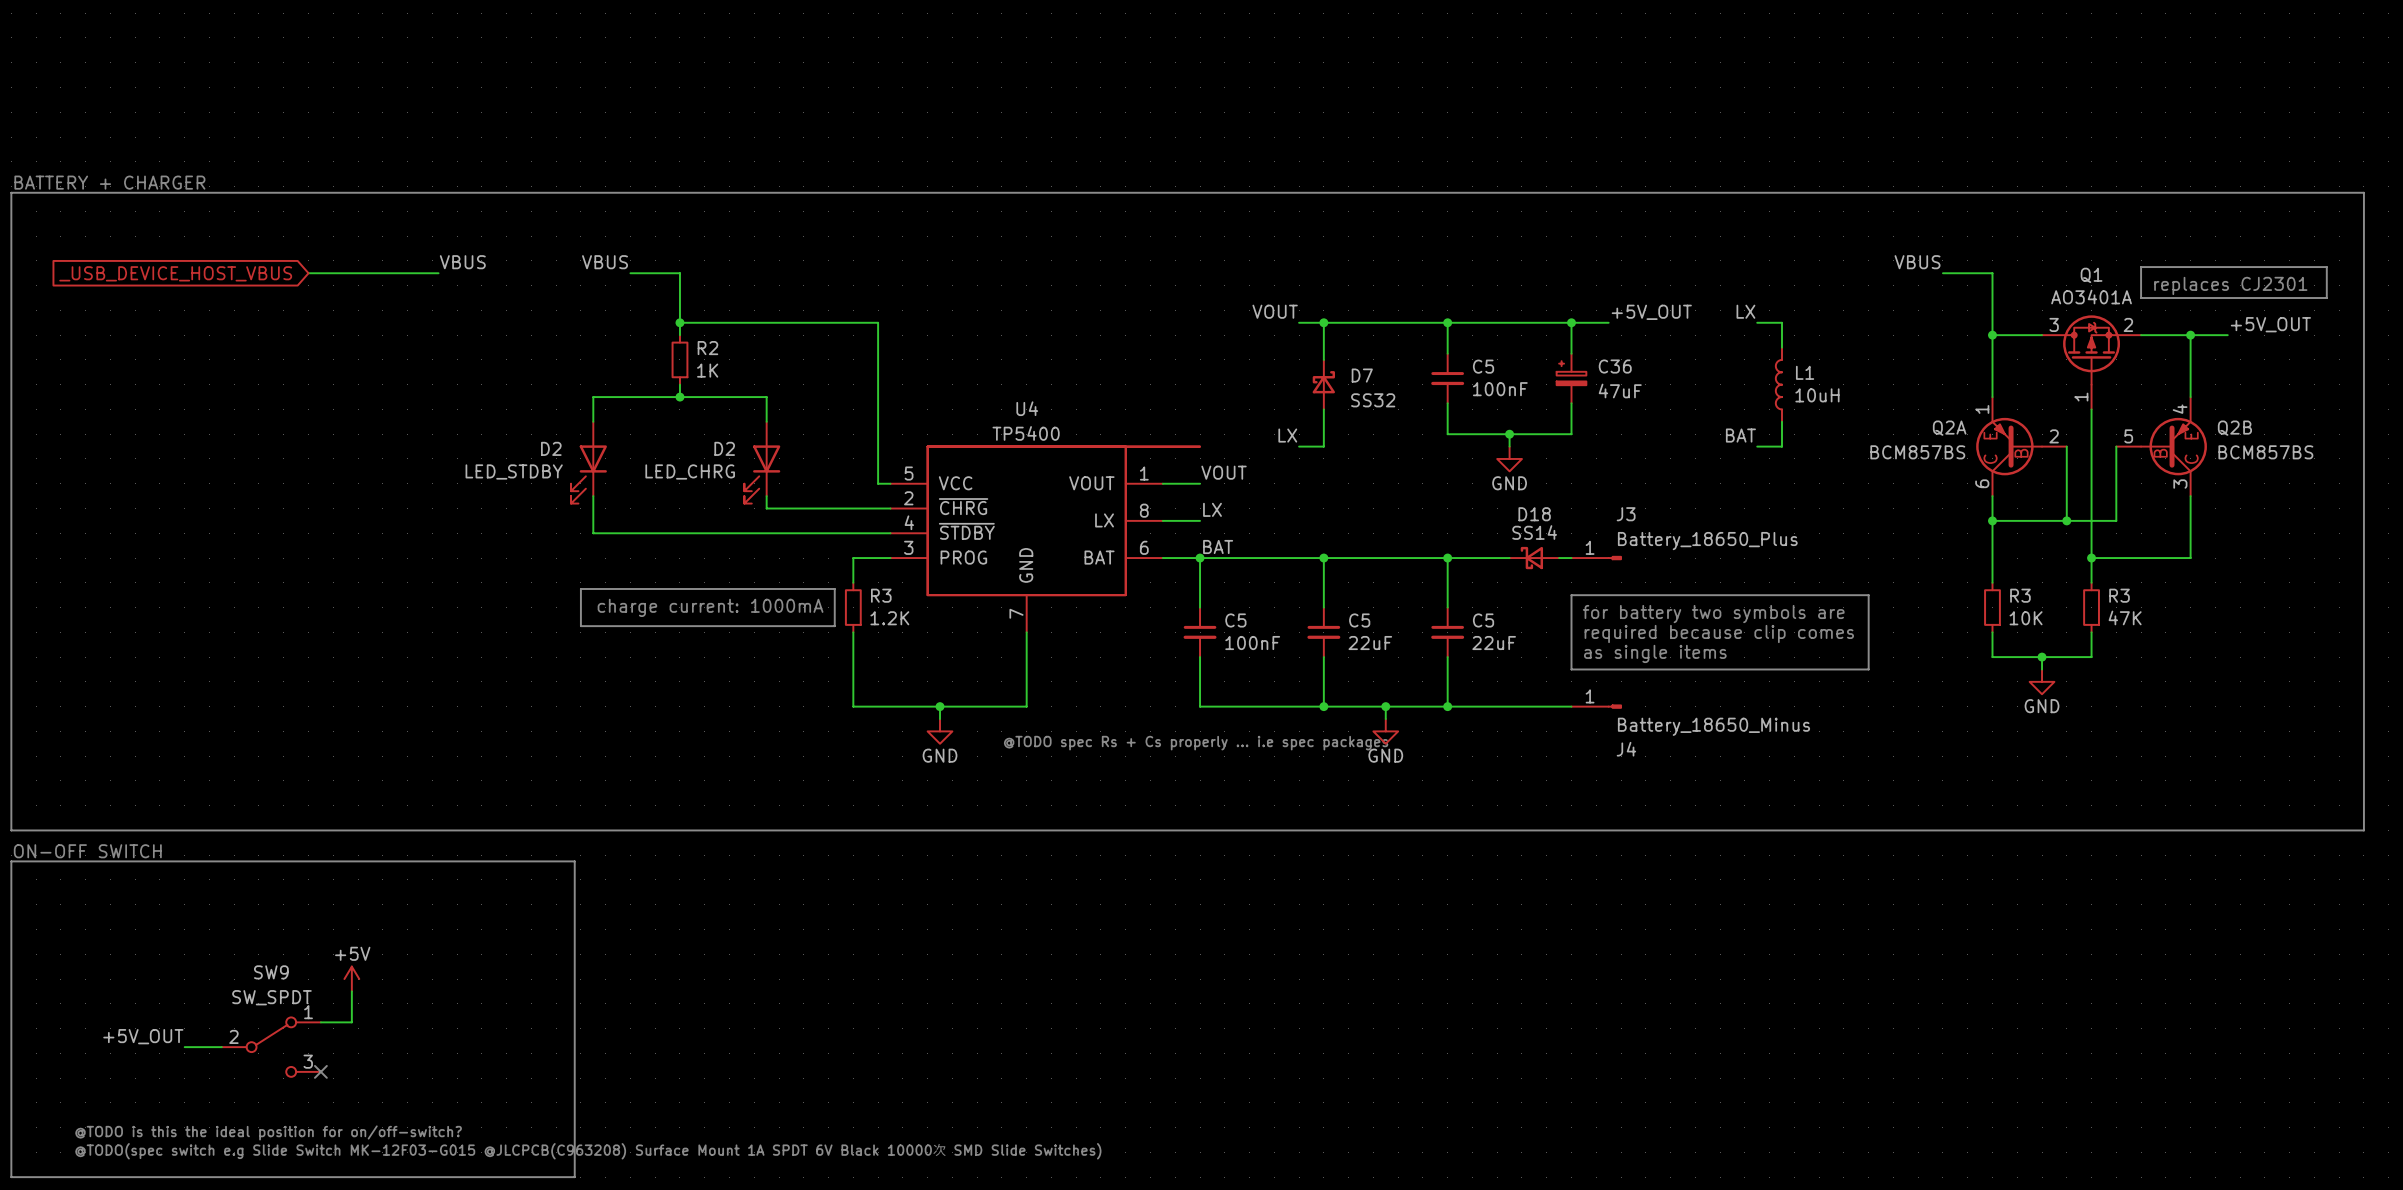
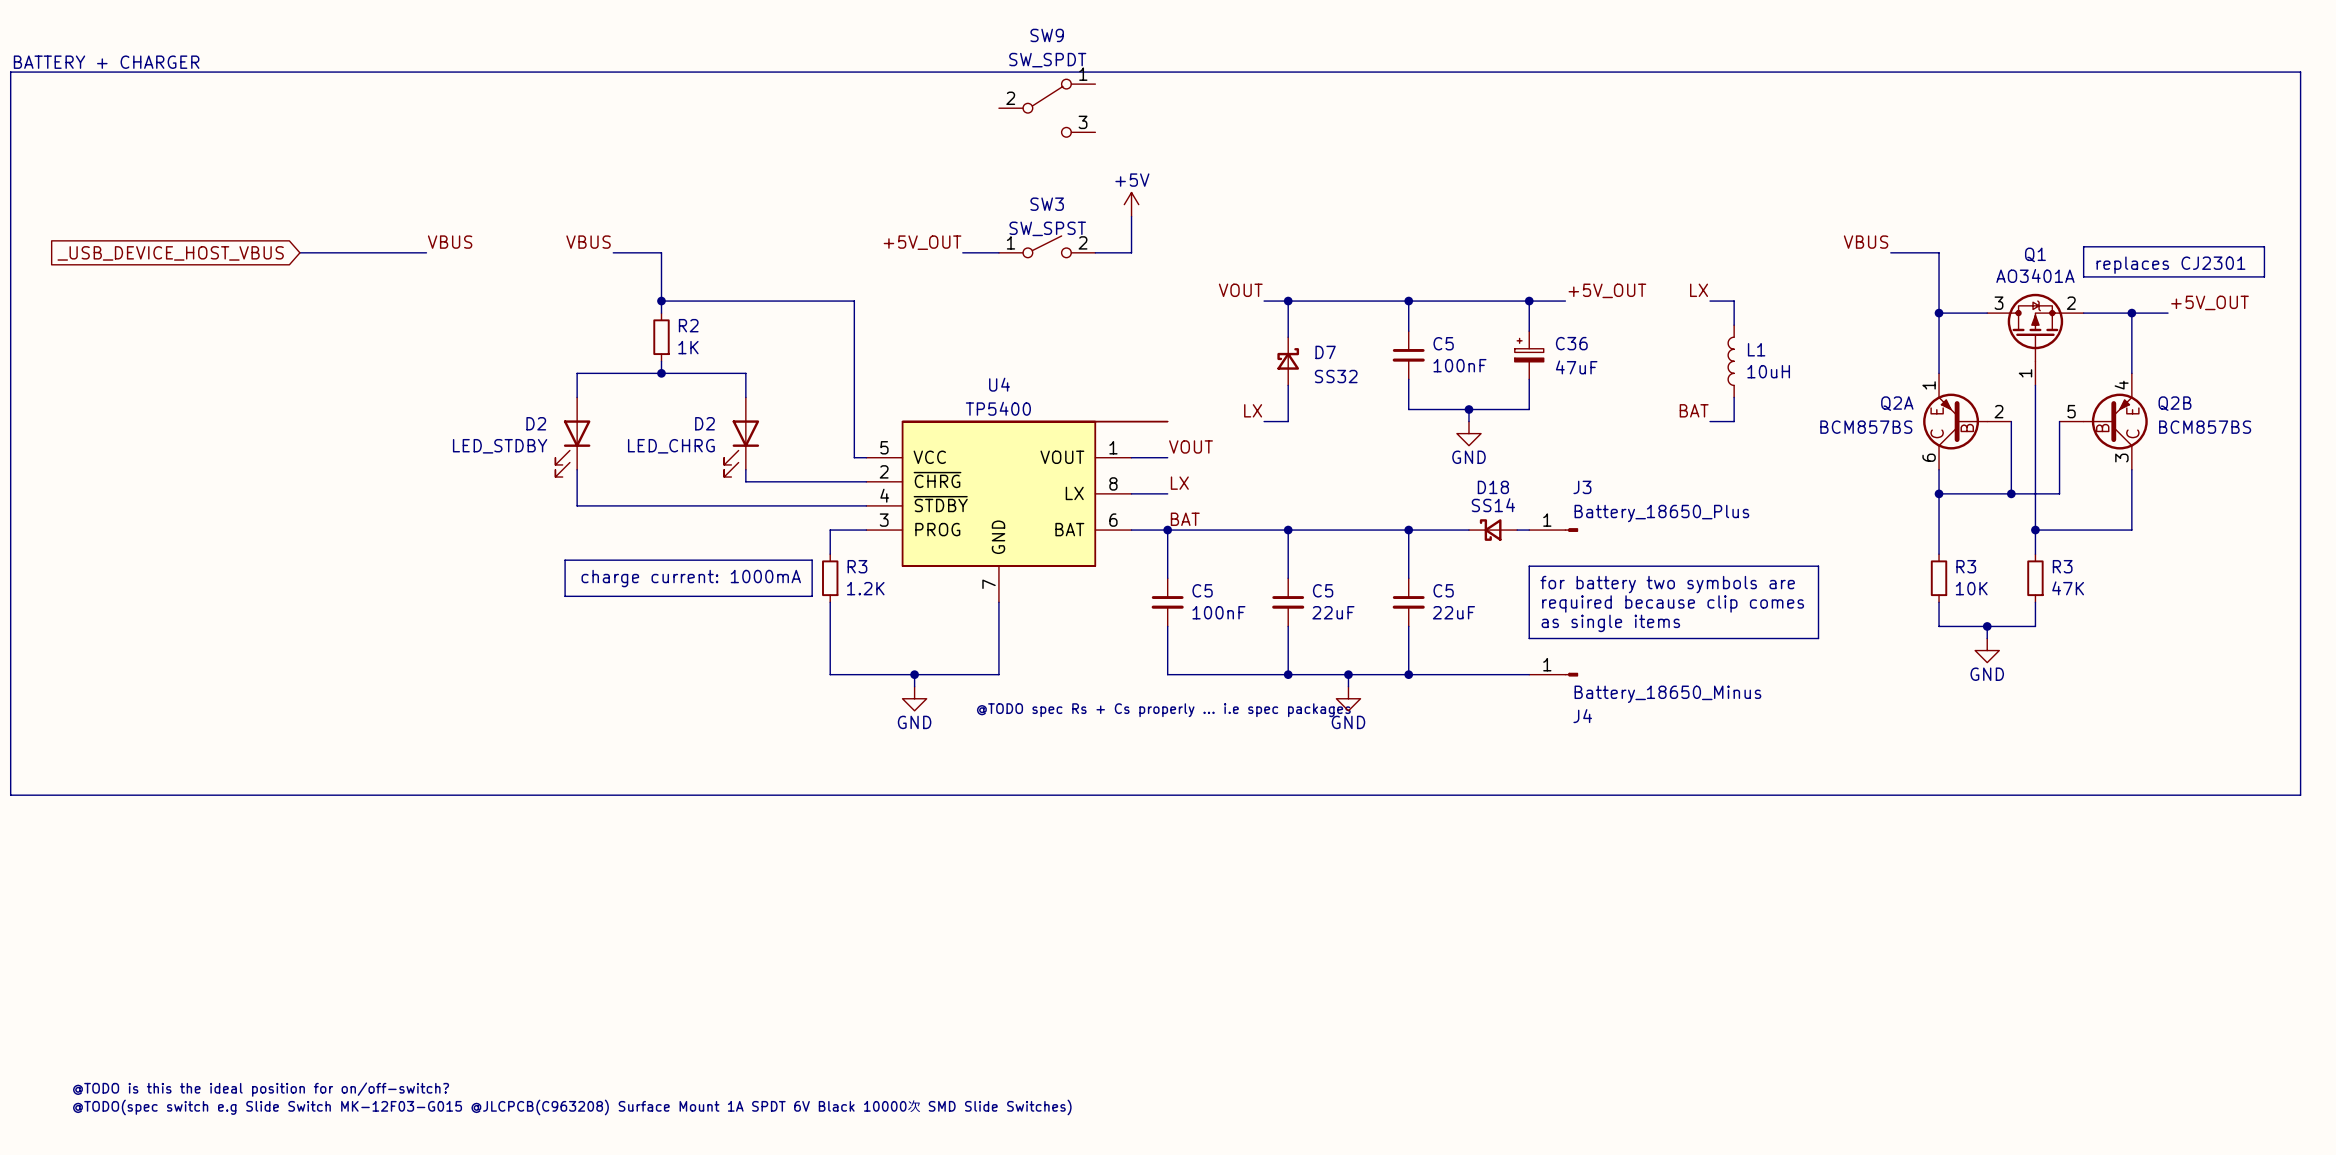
text position: BATTERY + CHARGER (109, 182) -> BATTERY + CHARGER (106, 62)
line: (11, 192) (2363, 192) -> (10, 174) (10, 72) (2300, 72) (2300, 174)
power symbol: none -> +5V (1131, 204)
wire: none -> (1131, 216) (1131, 252) (1095, 252)
label: none -> +5V_OUT (922, 242)
SW3: none -> SW_SPST (1047, 246)
wire: none -> (962, 252) (998, 252)
text: ON-OFF SWITCH (87, 851) -> none
line: (11, 861) (574, 861) (574, 1177) (11, 1177) (11, 861) -> none
power symbol: +5V (351, 979) -> none
wire: (351, 991) (351, 1022) (320, 1022) -> none
label: +5V_OUT (143, 1036) -> none
wire: (184, 1047) (221, 1047) -> none
SW9 position: (271, 1047) -> (1047, 108)
no-connect mark: (320, 1071) -> none

